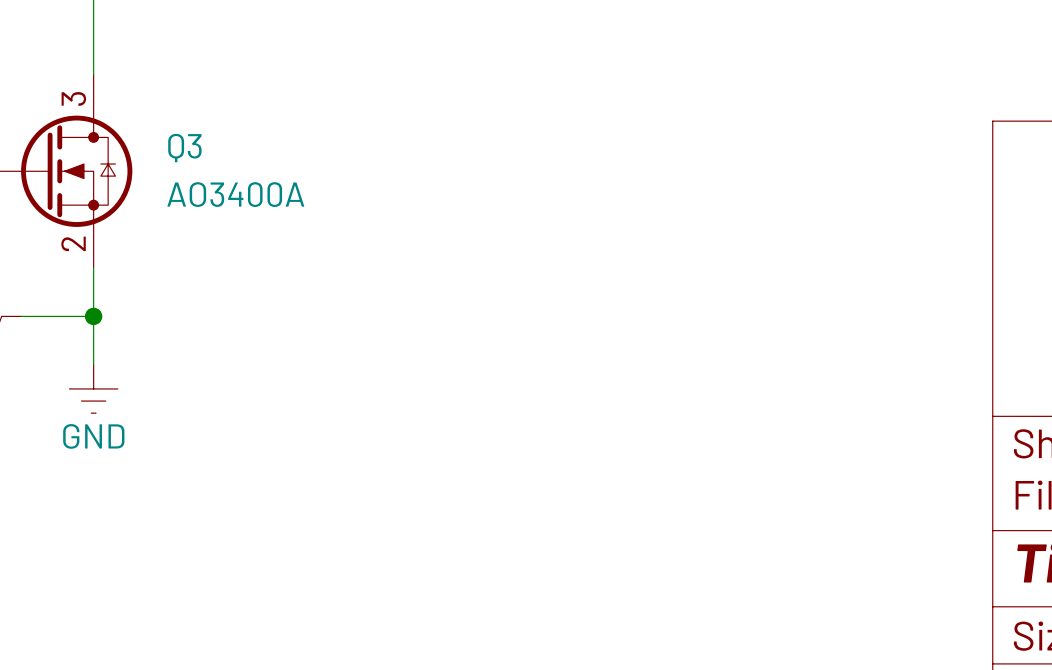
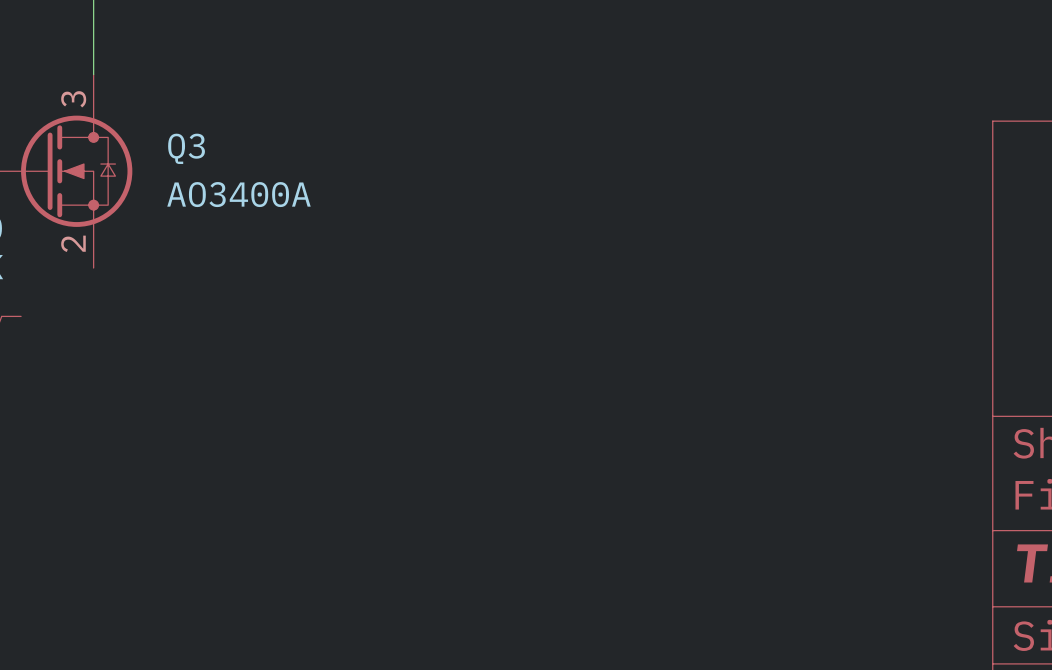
wire: (93, 268) (93, 364) -> none
wire: (21, 316) (93, 316) -> none
junction: (93, 316) -> none
power symbol: GND (93, 388) -> none

